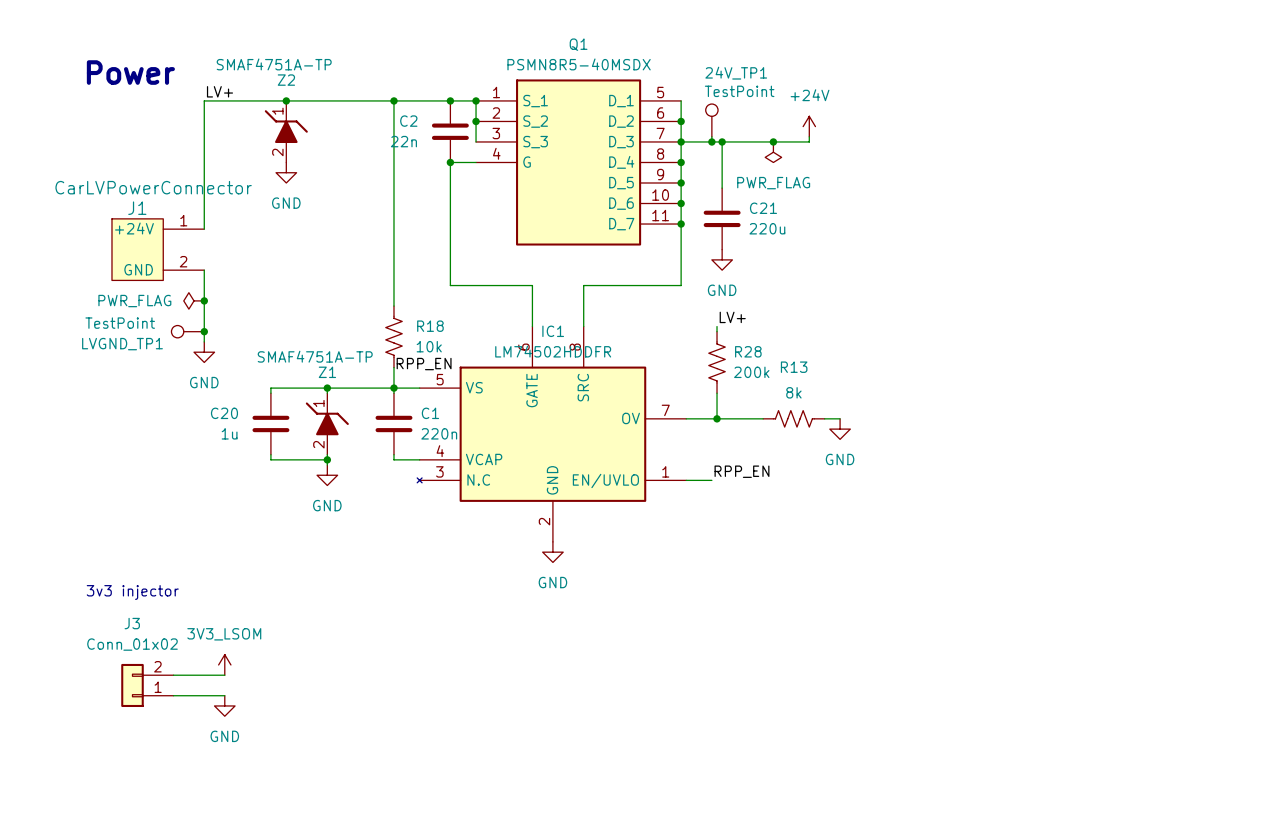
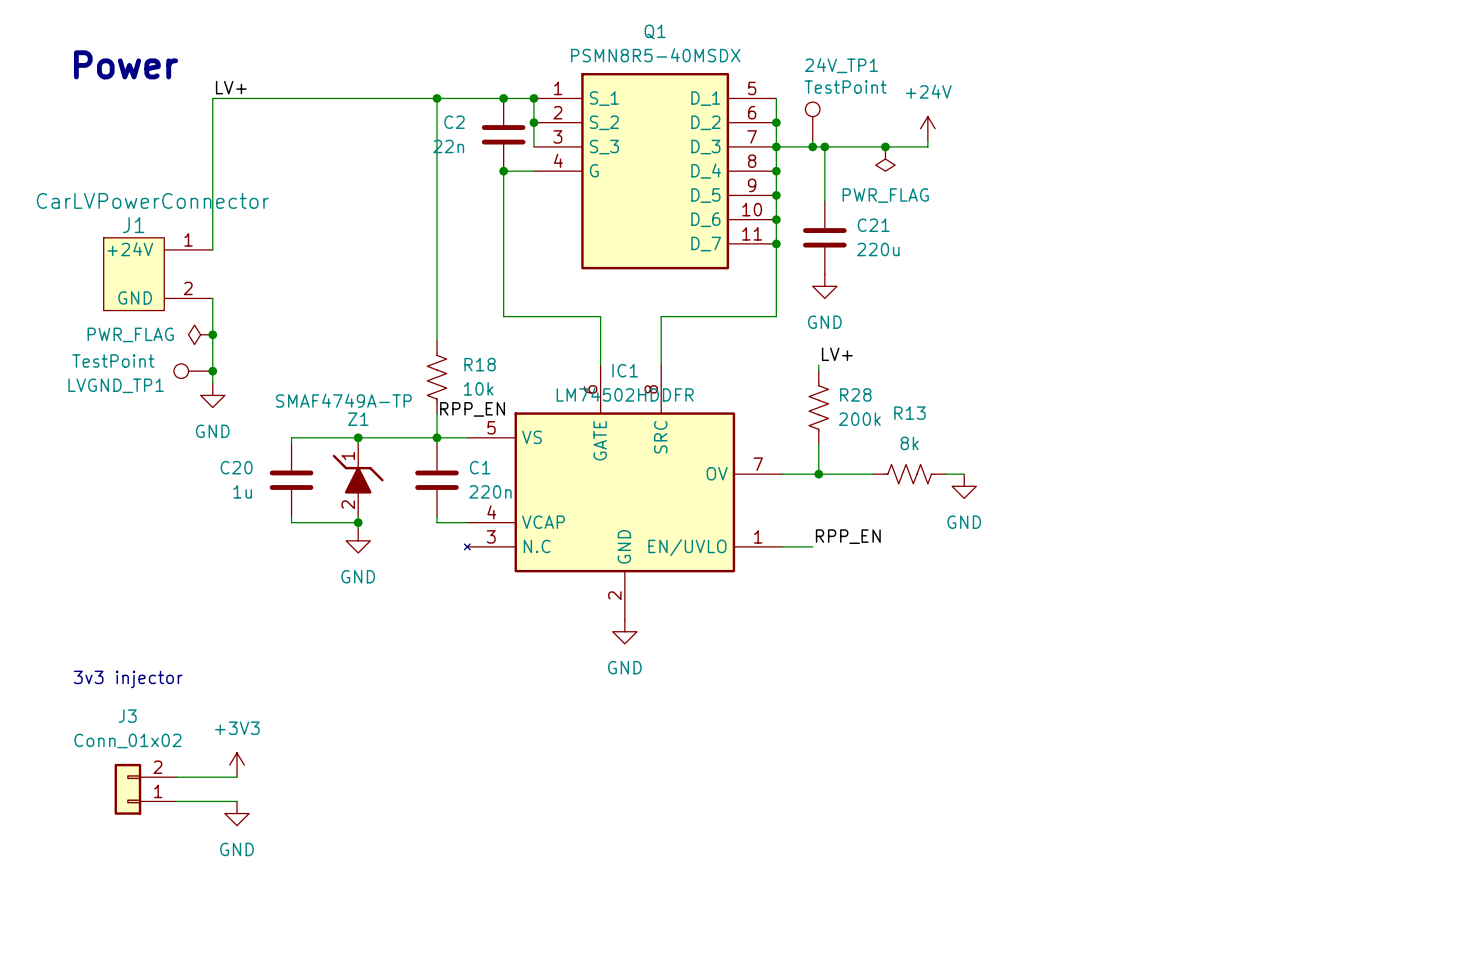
junction: (286, 100) -> none
Z2: SMAF4751A-TP (286, 131) -> none
power symbol: GND (286, 172) -> none
Z1 value: SMAF4751A-TP (315, 356) -> SMAF4749A-TP (343, 400)
power symbol: 3V3_LSOM (224, 664) -> +3V3 (237, 765)

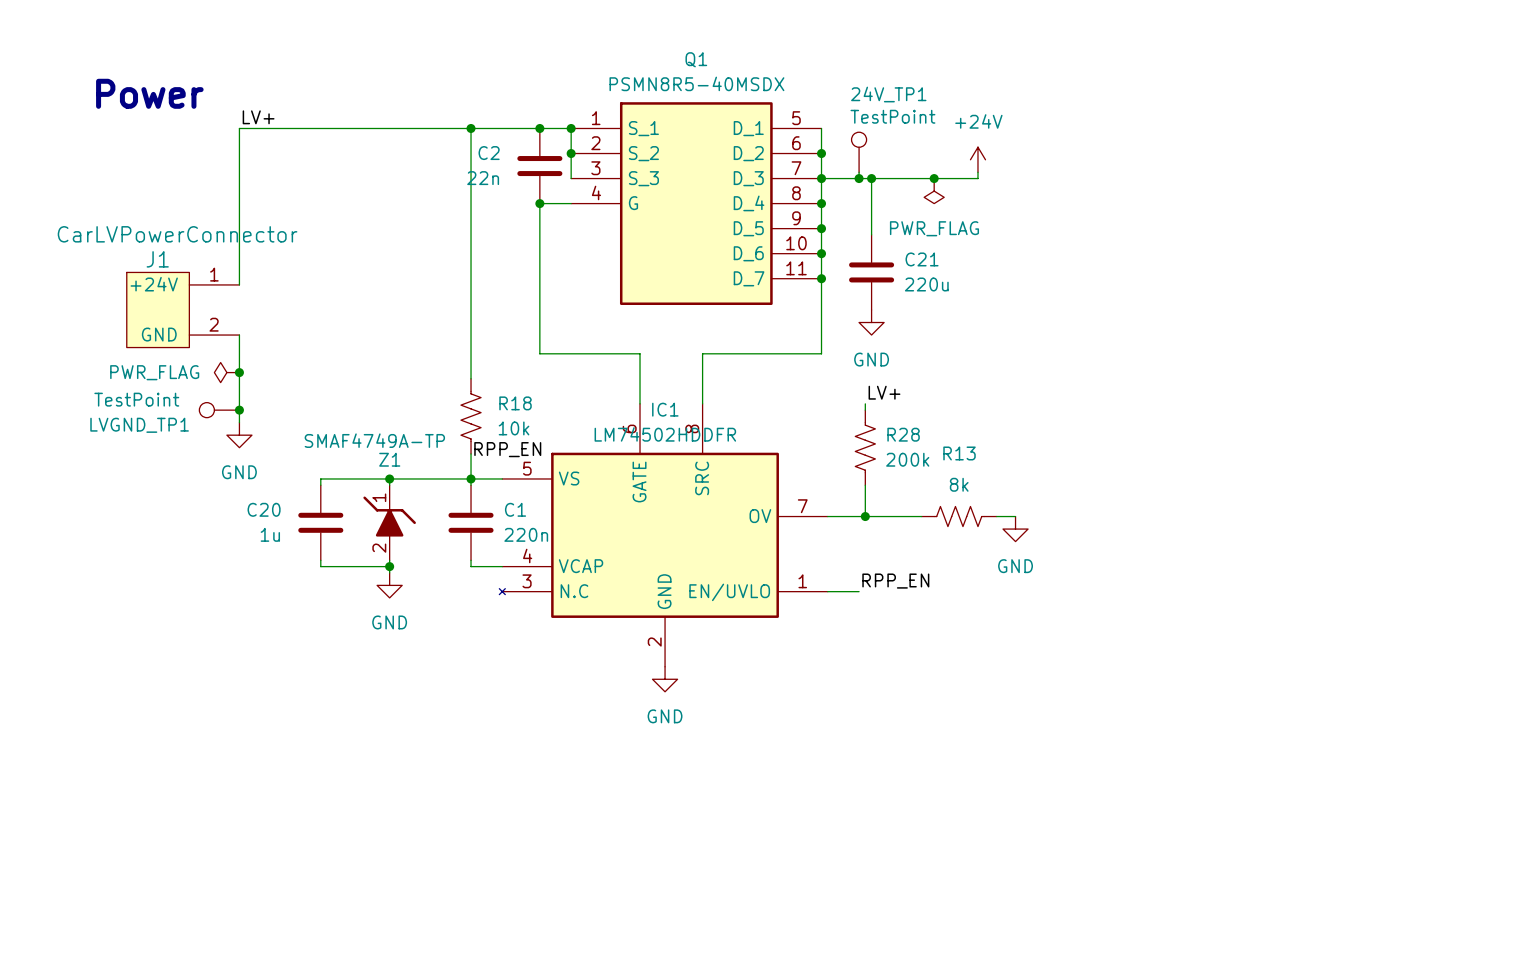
text: 3v3 injector (128, 679) -> none
power symbol: +3V3 (237, 765) -> none
wire: (176, 777) (237, 777) -> none
J3: Conn_01x02 (145, 789) -> none
wire: (176, 801) (237, 801) -> none
power symbol: GND (237, 813) -> none

